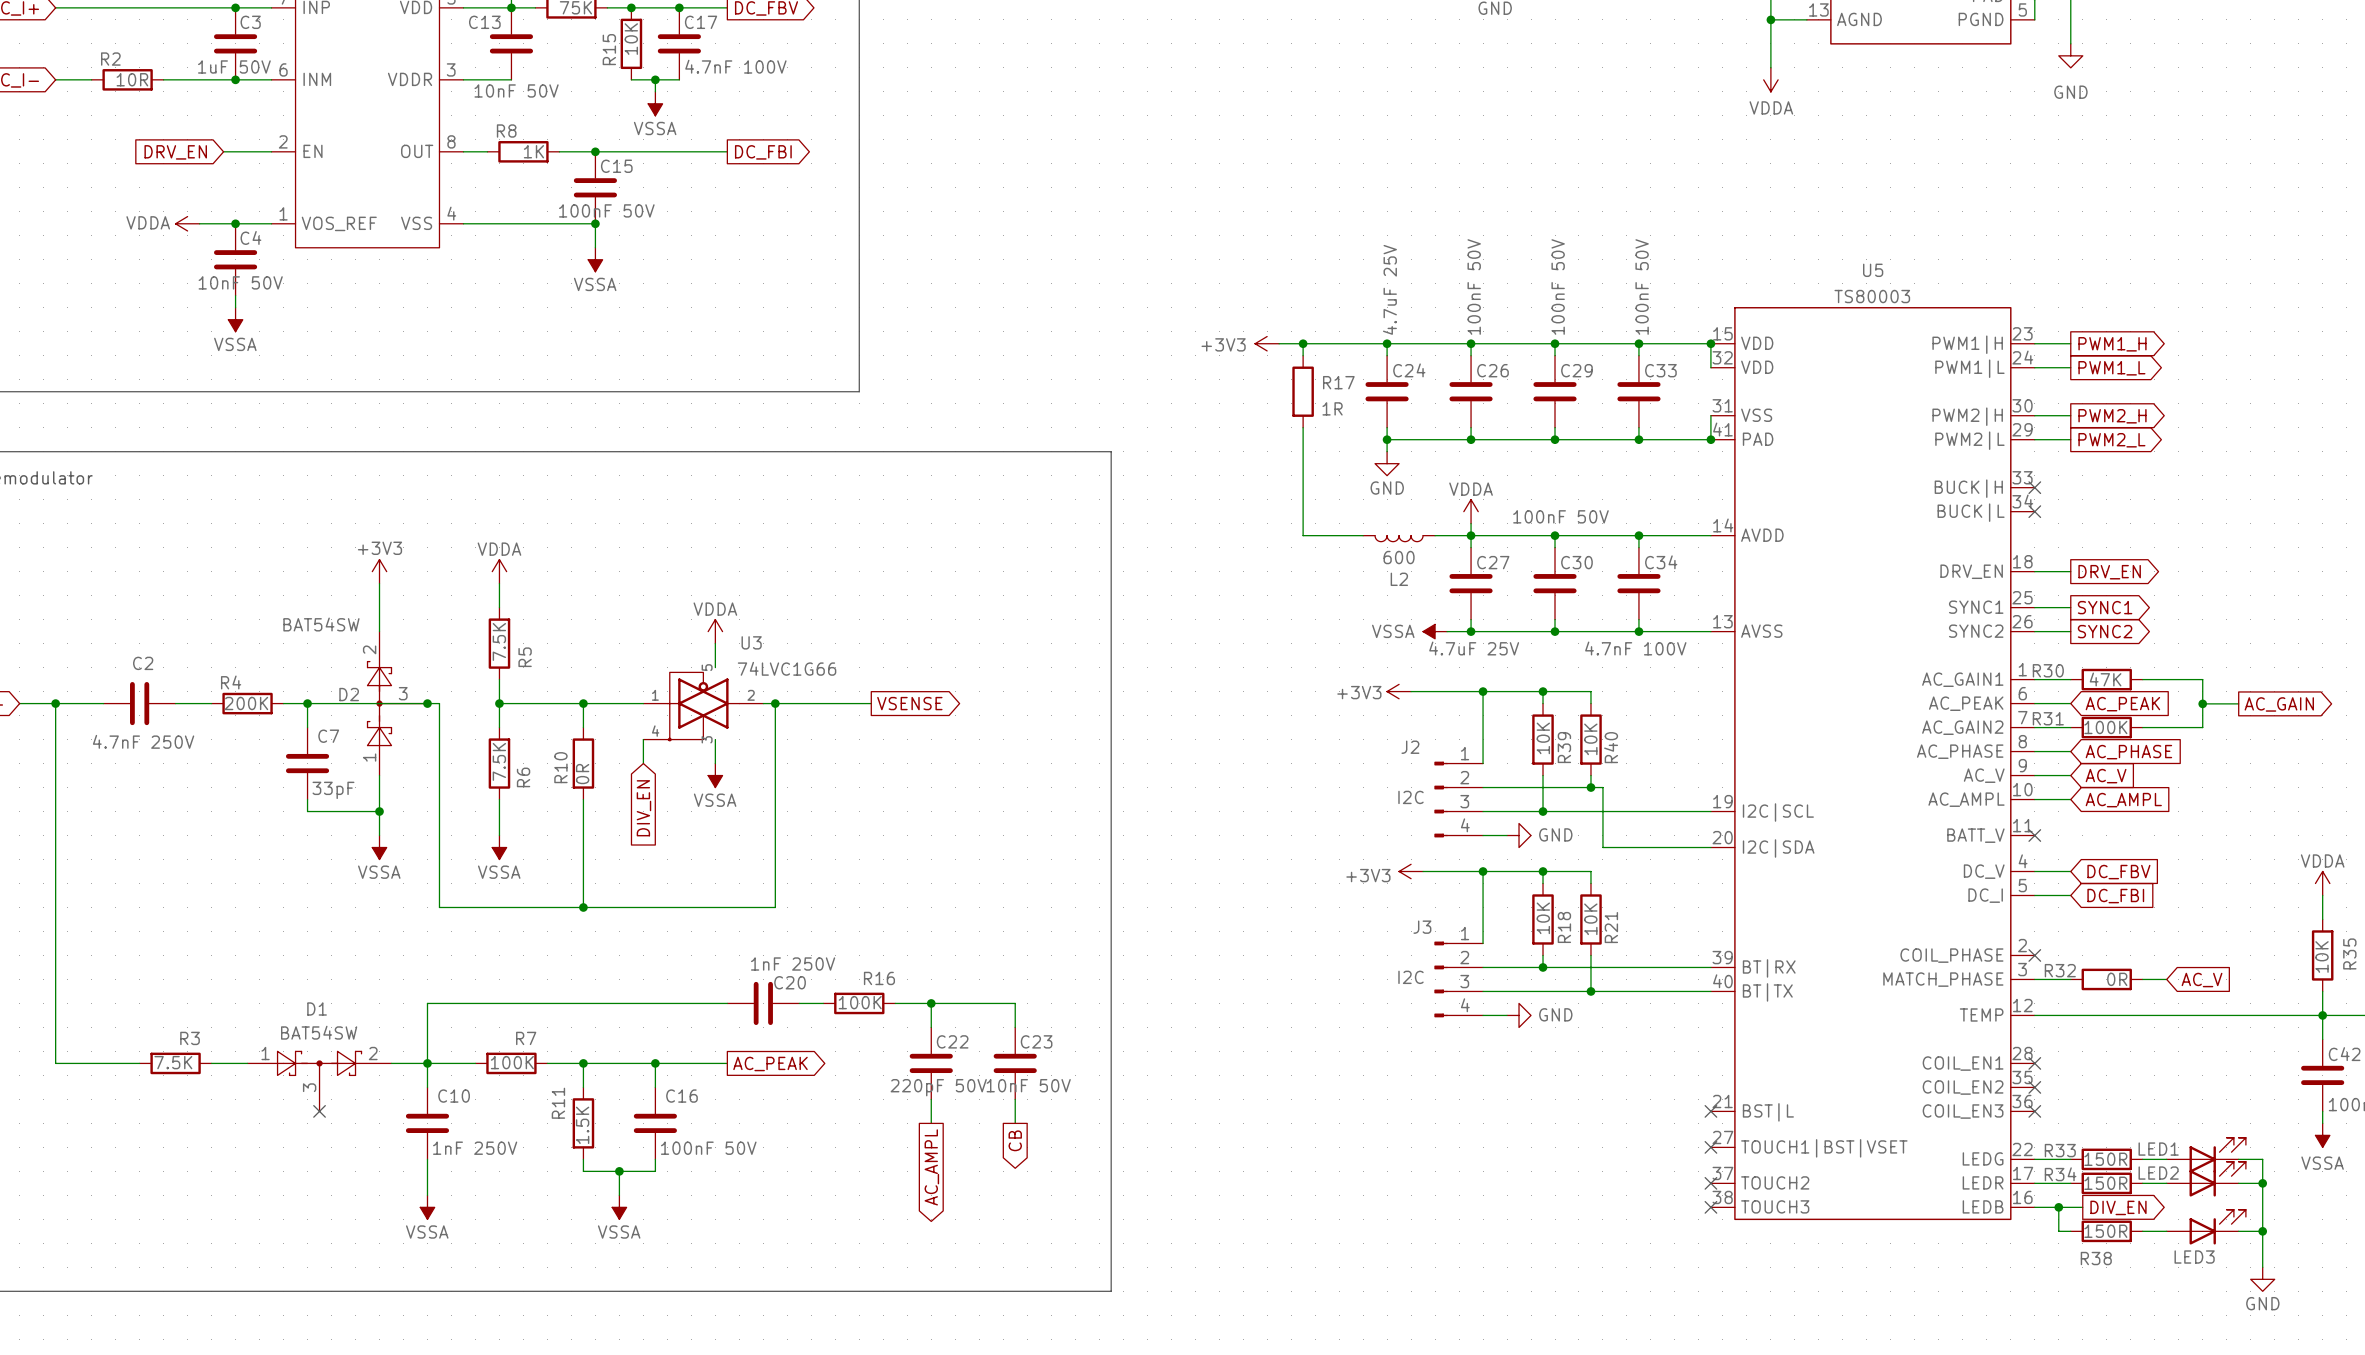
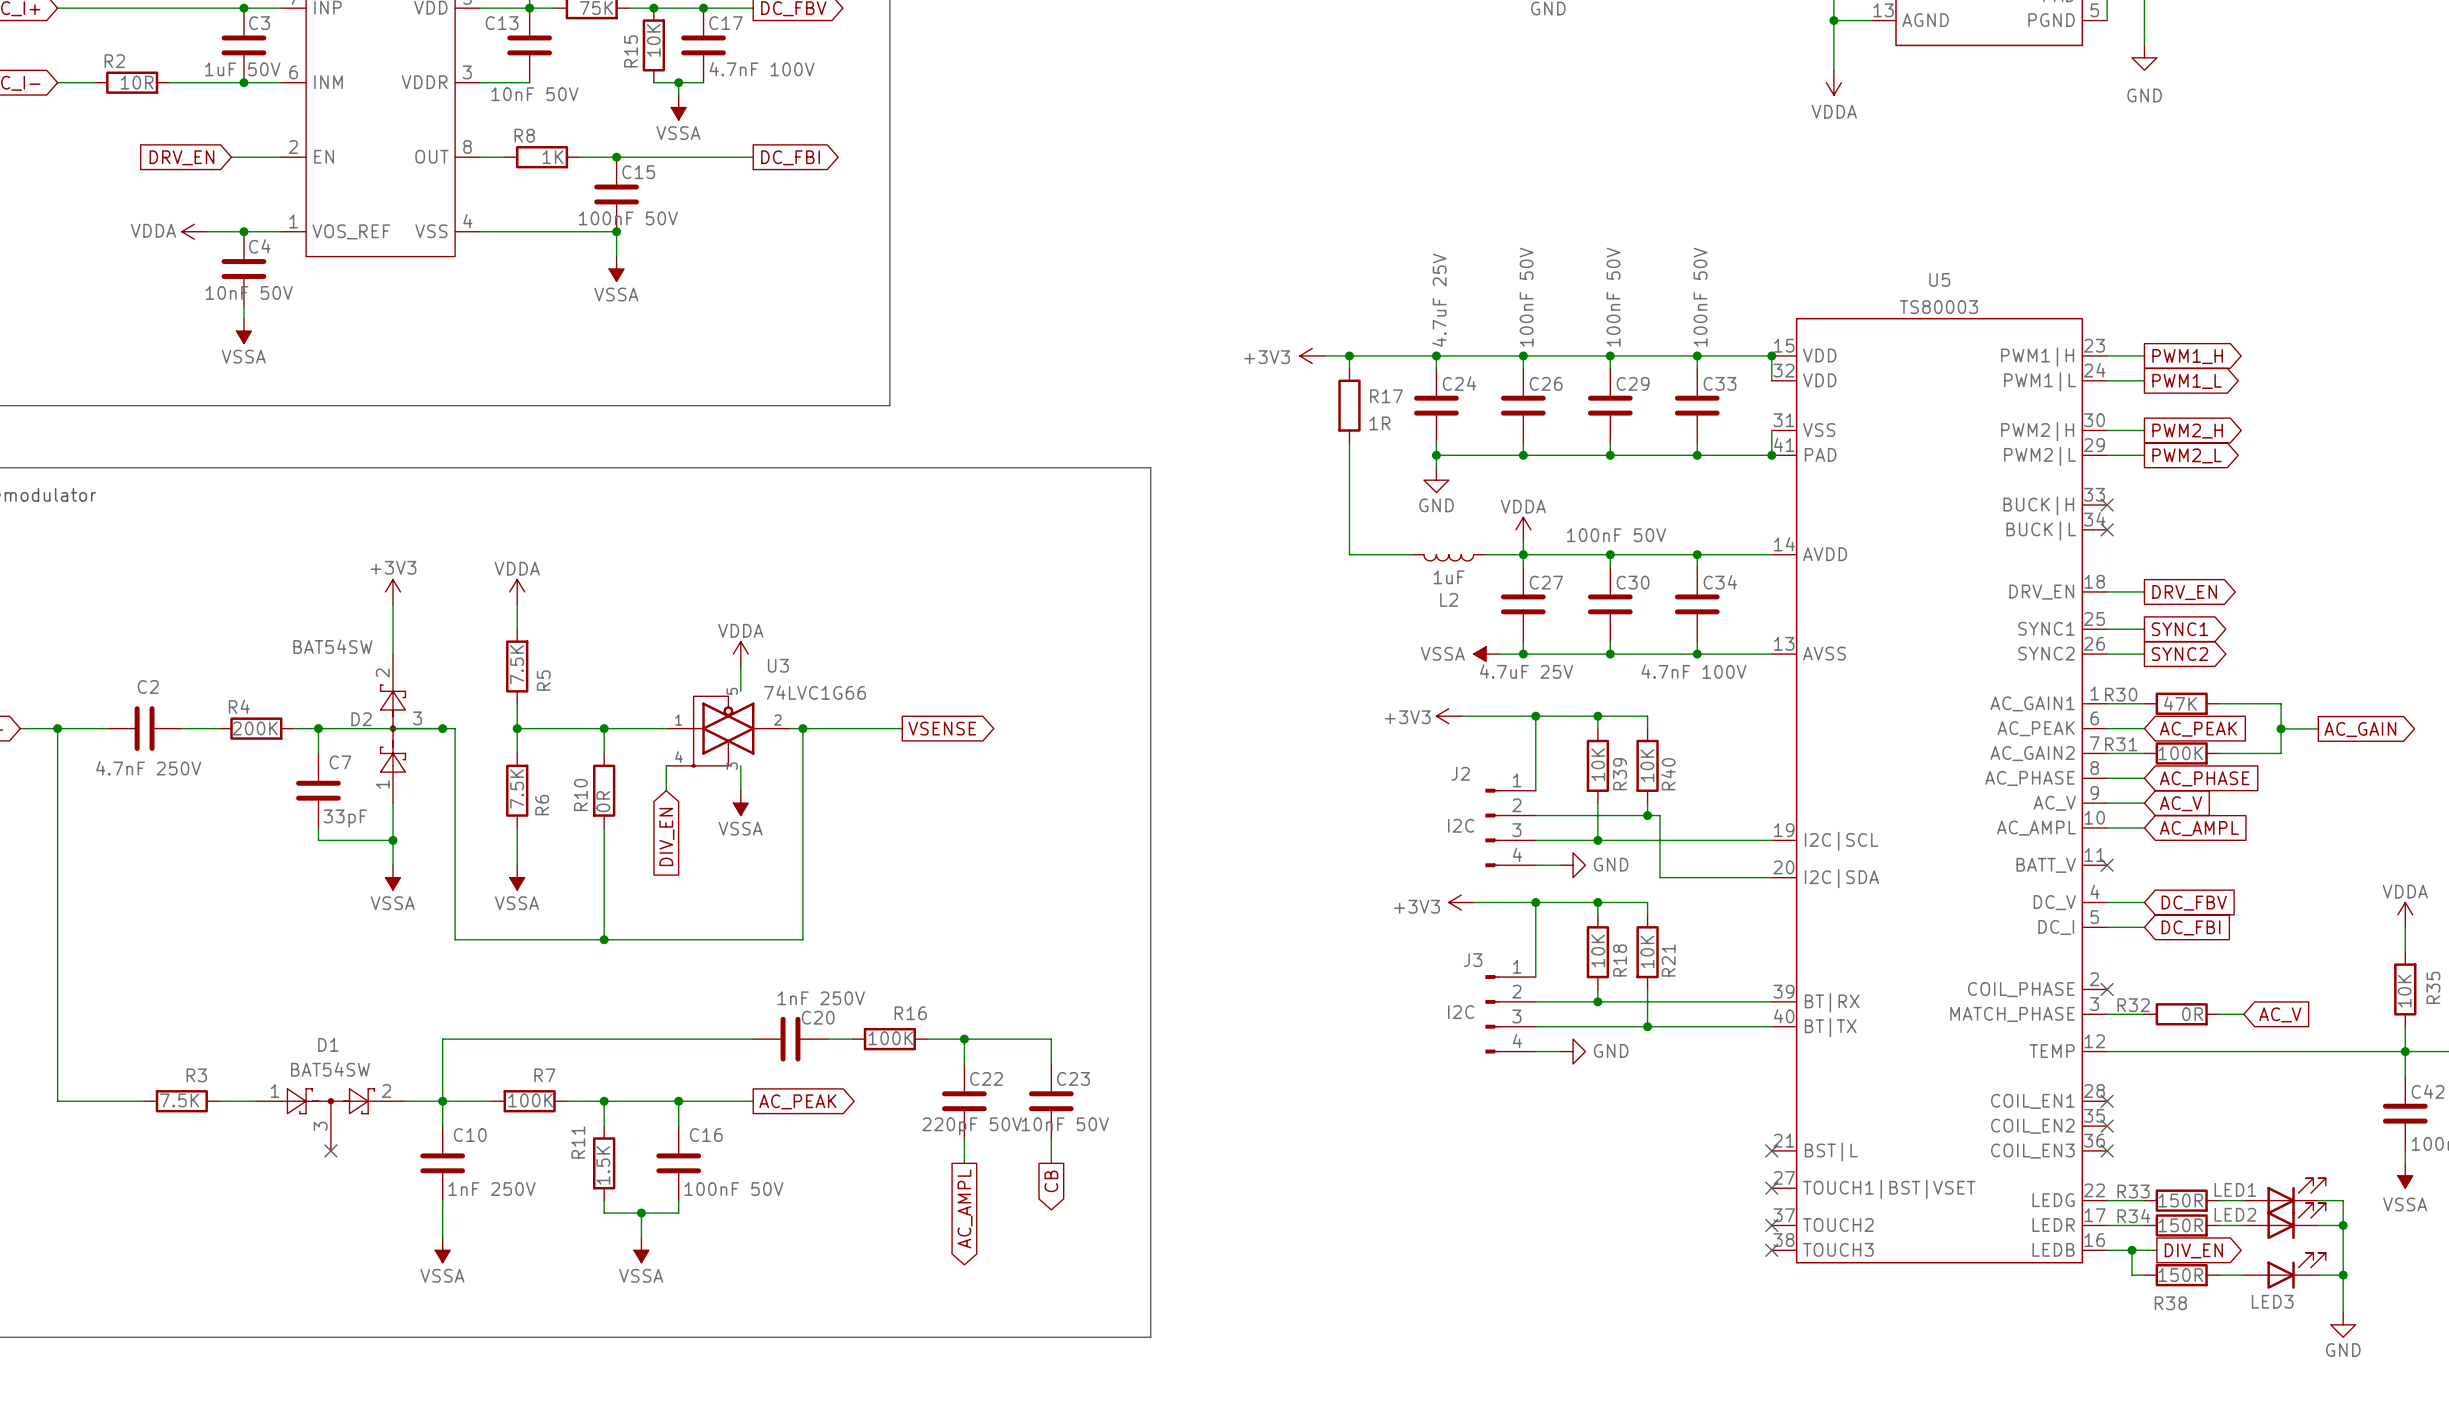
L2 value: 600 (1399, 557) -> 1uF (1449, 577)

